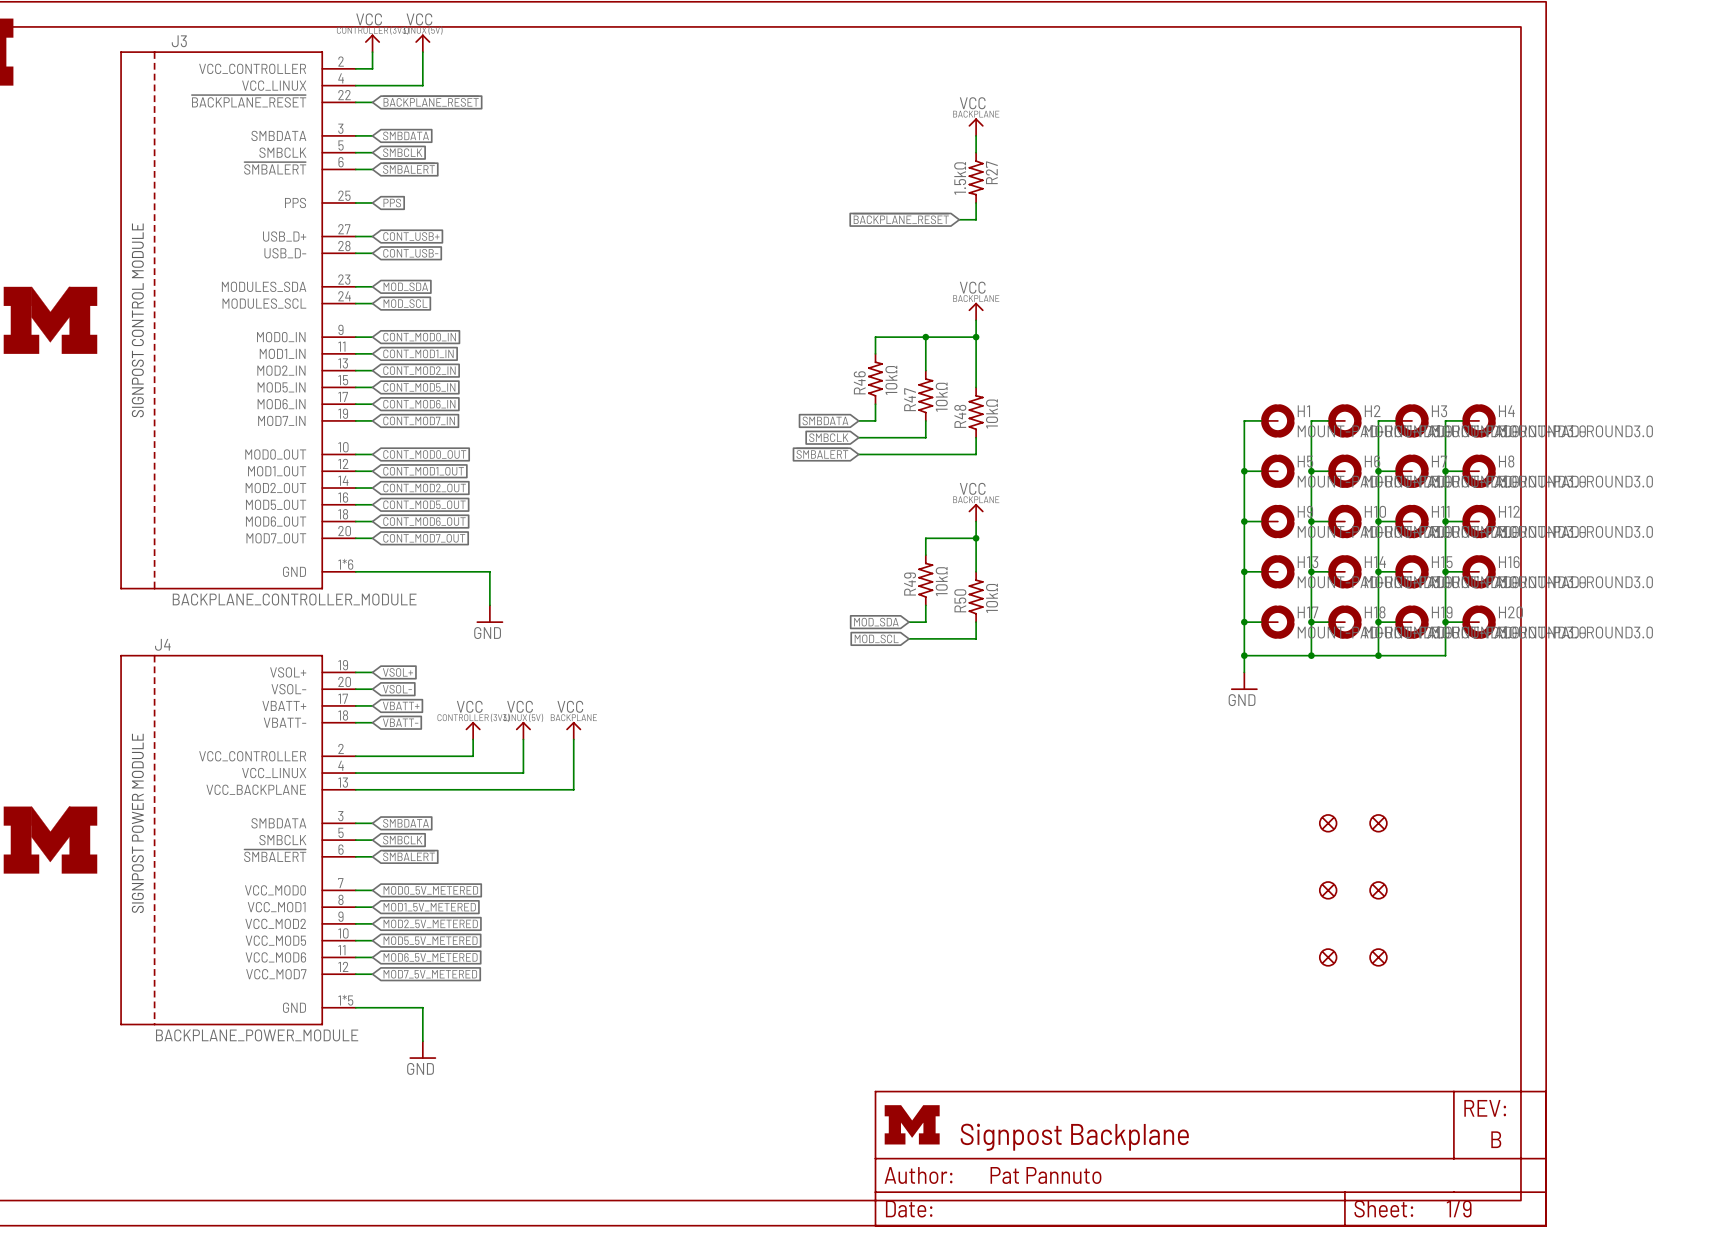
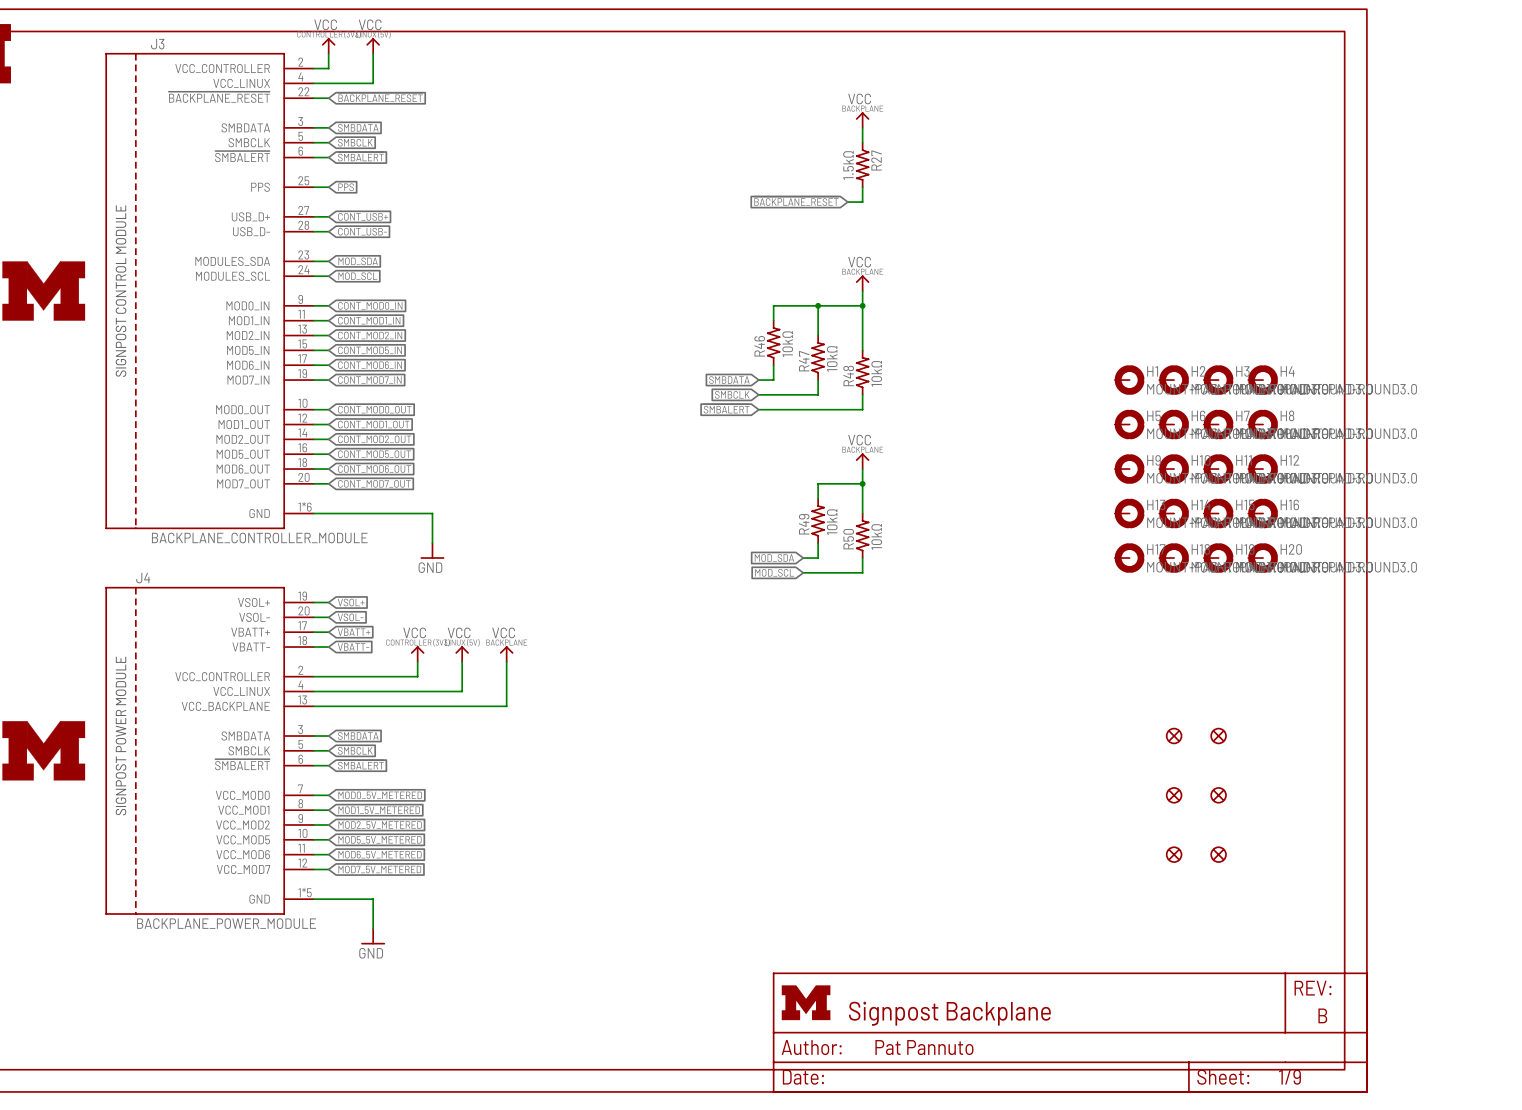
wire: (1261, 420) (1244, 420) (1244, 672) -> none
wire: (1328, 420) (1311, 420) (1311, 655) -> none
H2 position: (1344, 420) -> (1174, 380)
wire: (1395, 420) (1378, 420) (1378, 655) -> none
H3 position: (1412, 420) -> (1218, 380)
wire: (1462, 420) (1445, 420) (1445, 655) (1244, 655) -> none
H4 position: (1479, 420) -> (1263, 380)
wire: (1244, 471) (1261, 471) -> none
junction: (1244, 471) -> none
junction: (1311, 471) -> none
H6 position: (1344, 471) -> (1174, 424)
wire: (1378, 471) (1395, 471) -> none
junction: (1378, 471) -> none
H7 position: (1412, 471) -> (1218, 424)
wire: (1445, 471) (1462, 471) -> none
junction: (1445, 471) -> none
H8 position: (1479, 471) -> (1263, 424)
wire: (1244, 521) (1261, 521) -> none
junction: (1244, 521) -> none
junction: (1311, 521) -> none
H10 position: (1344, 521) -> (1174, 469)
wire: (1378, 521) (1395, 521) -> none
junction: (1378, 521) -> none
H11 position: (1412, 521) -> (1218, 469)
wire: (1445, 521) (1462, 521) -> none
junction: (1445, 521) -> none
H12 position: (1479, 521) -> (1263, 469)
wire: (1244, 571) (1261, 571) -> none
junction: (1244, 571) -> none
junction: (1311, 571) -> none
H14 position: (1344, 571) -> (1174, 513)
wire: (1378, 571) (1395, 571) -> none
junction: (1378, 571) -> none
H15 position: (1412, 571) -> (1218, 513)
wire: (1445, 571) (1462, 571) -> none
junction: (1445, 571) -> none
H16 position: (1479, 571) -> (1263, 513)
wire: (1244, 622) (1261, 622) -> none
junction: (1244, 622) -> none
junction: (1311, 622) -> none
H18 position: (1344, 622) -> (1174, 558)
wire: (1378, 622) (1395, 622) -> none
junction: (1378, 622) -> none
H19 position: (1412, 622) -> (1218, 558)
wire: (1445, 622) (1462, 622) -> none
junction: (1445, 622) -> none
H20 position: (1479, 622) -> (1263, 558)
junction: (1244, 655) -> none
junction: (1311, 655) -> none
junction: (1378, 655) -> none
power symbol: GND (1244, 681) -> none

